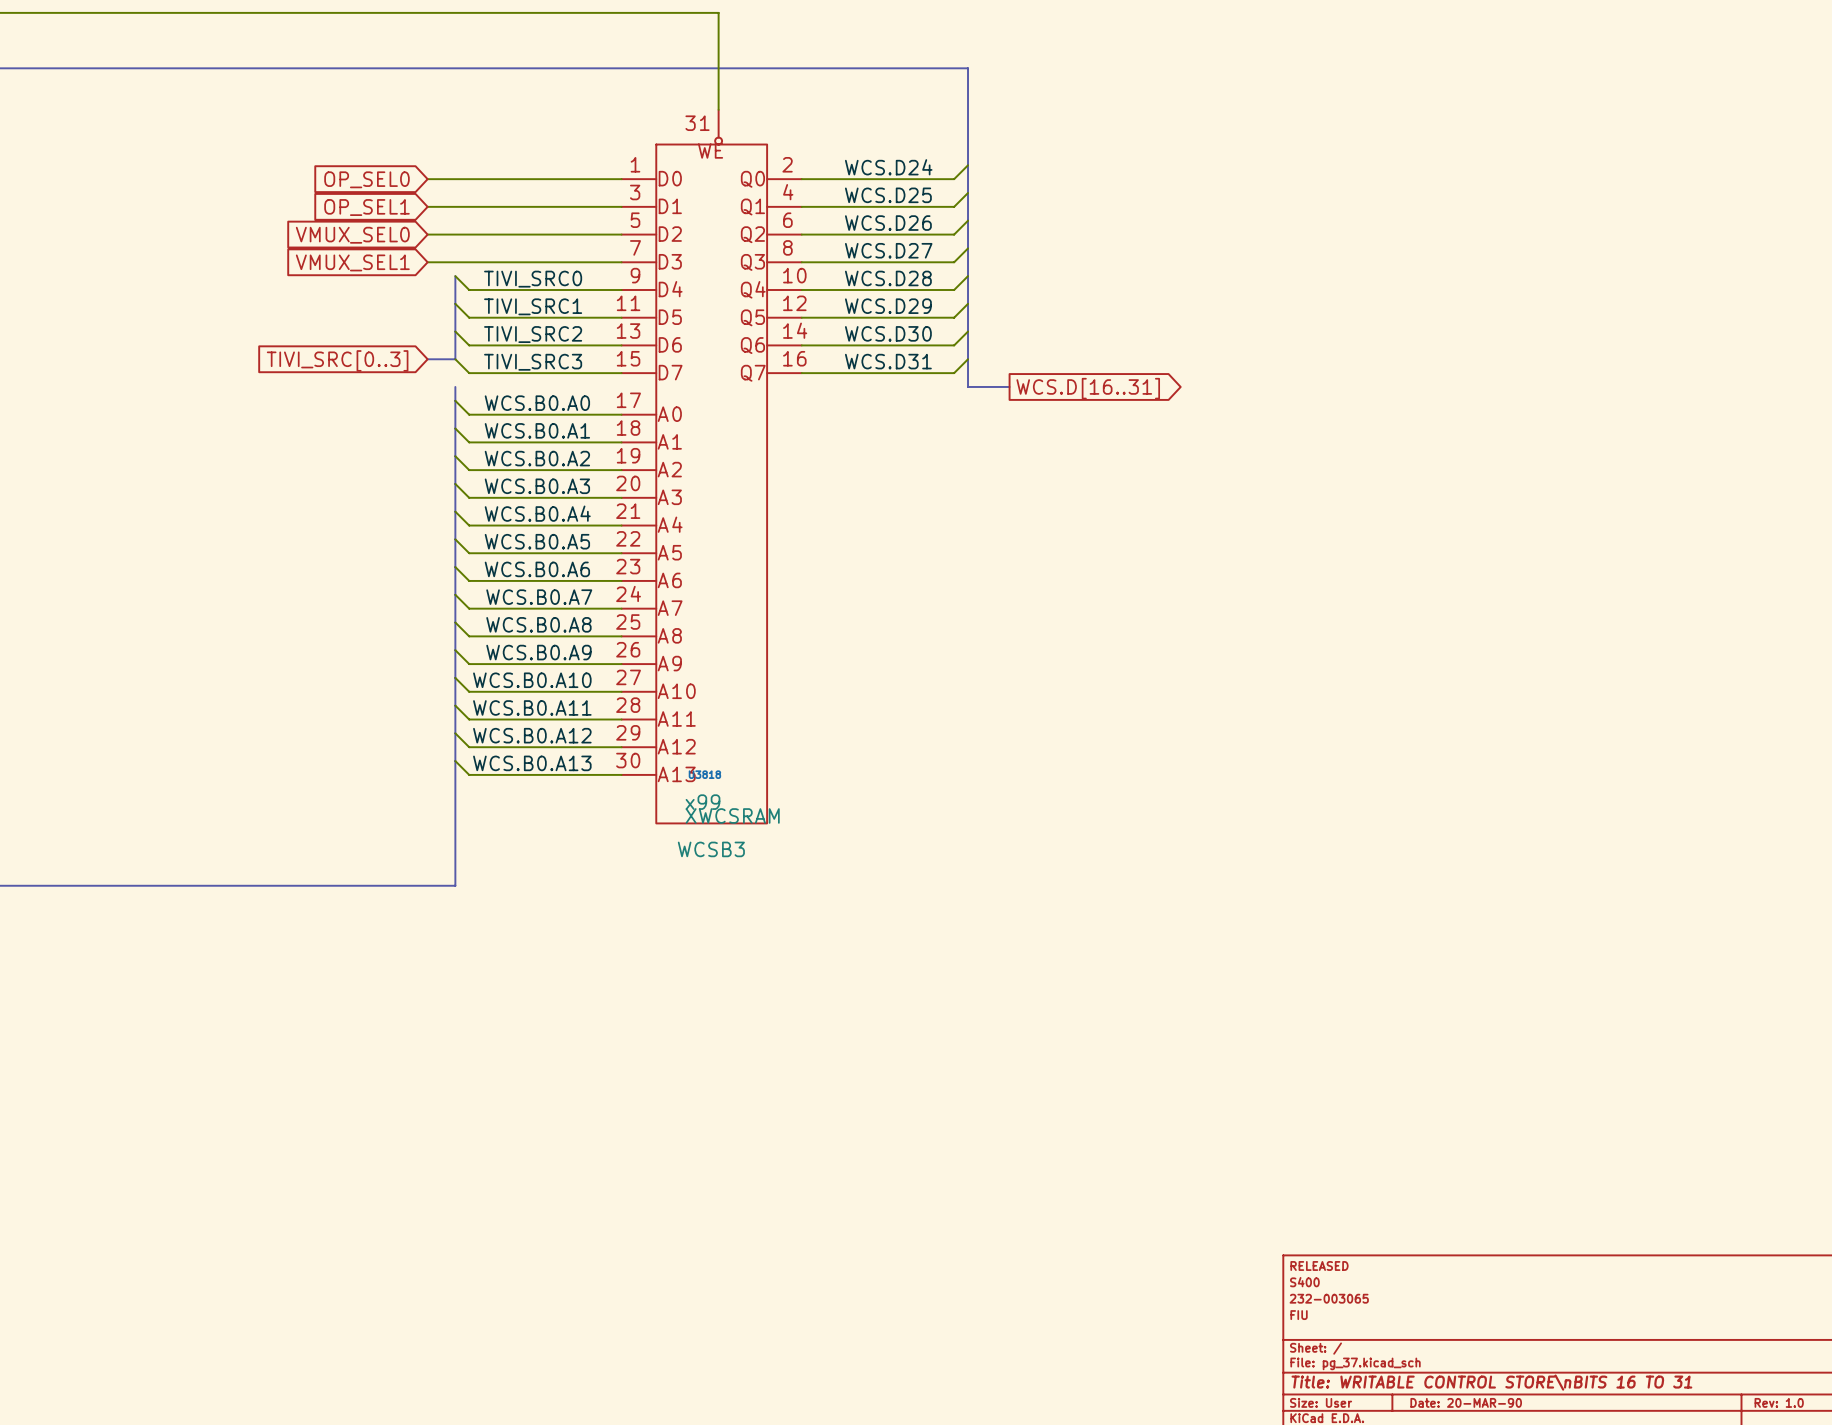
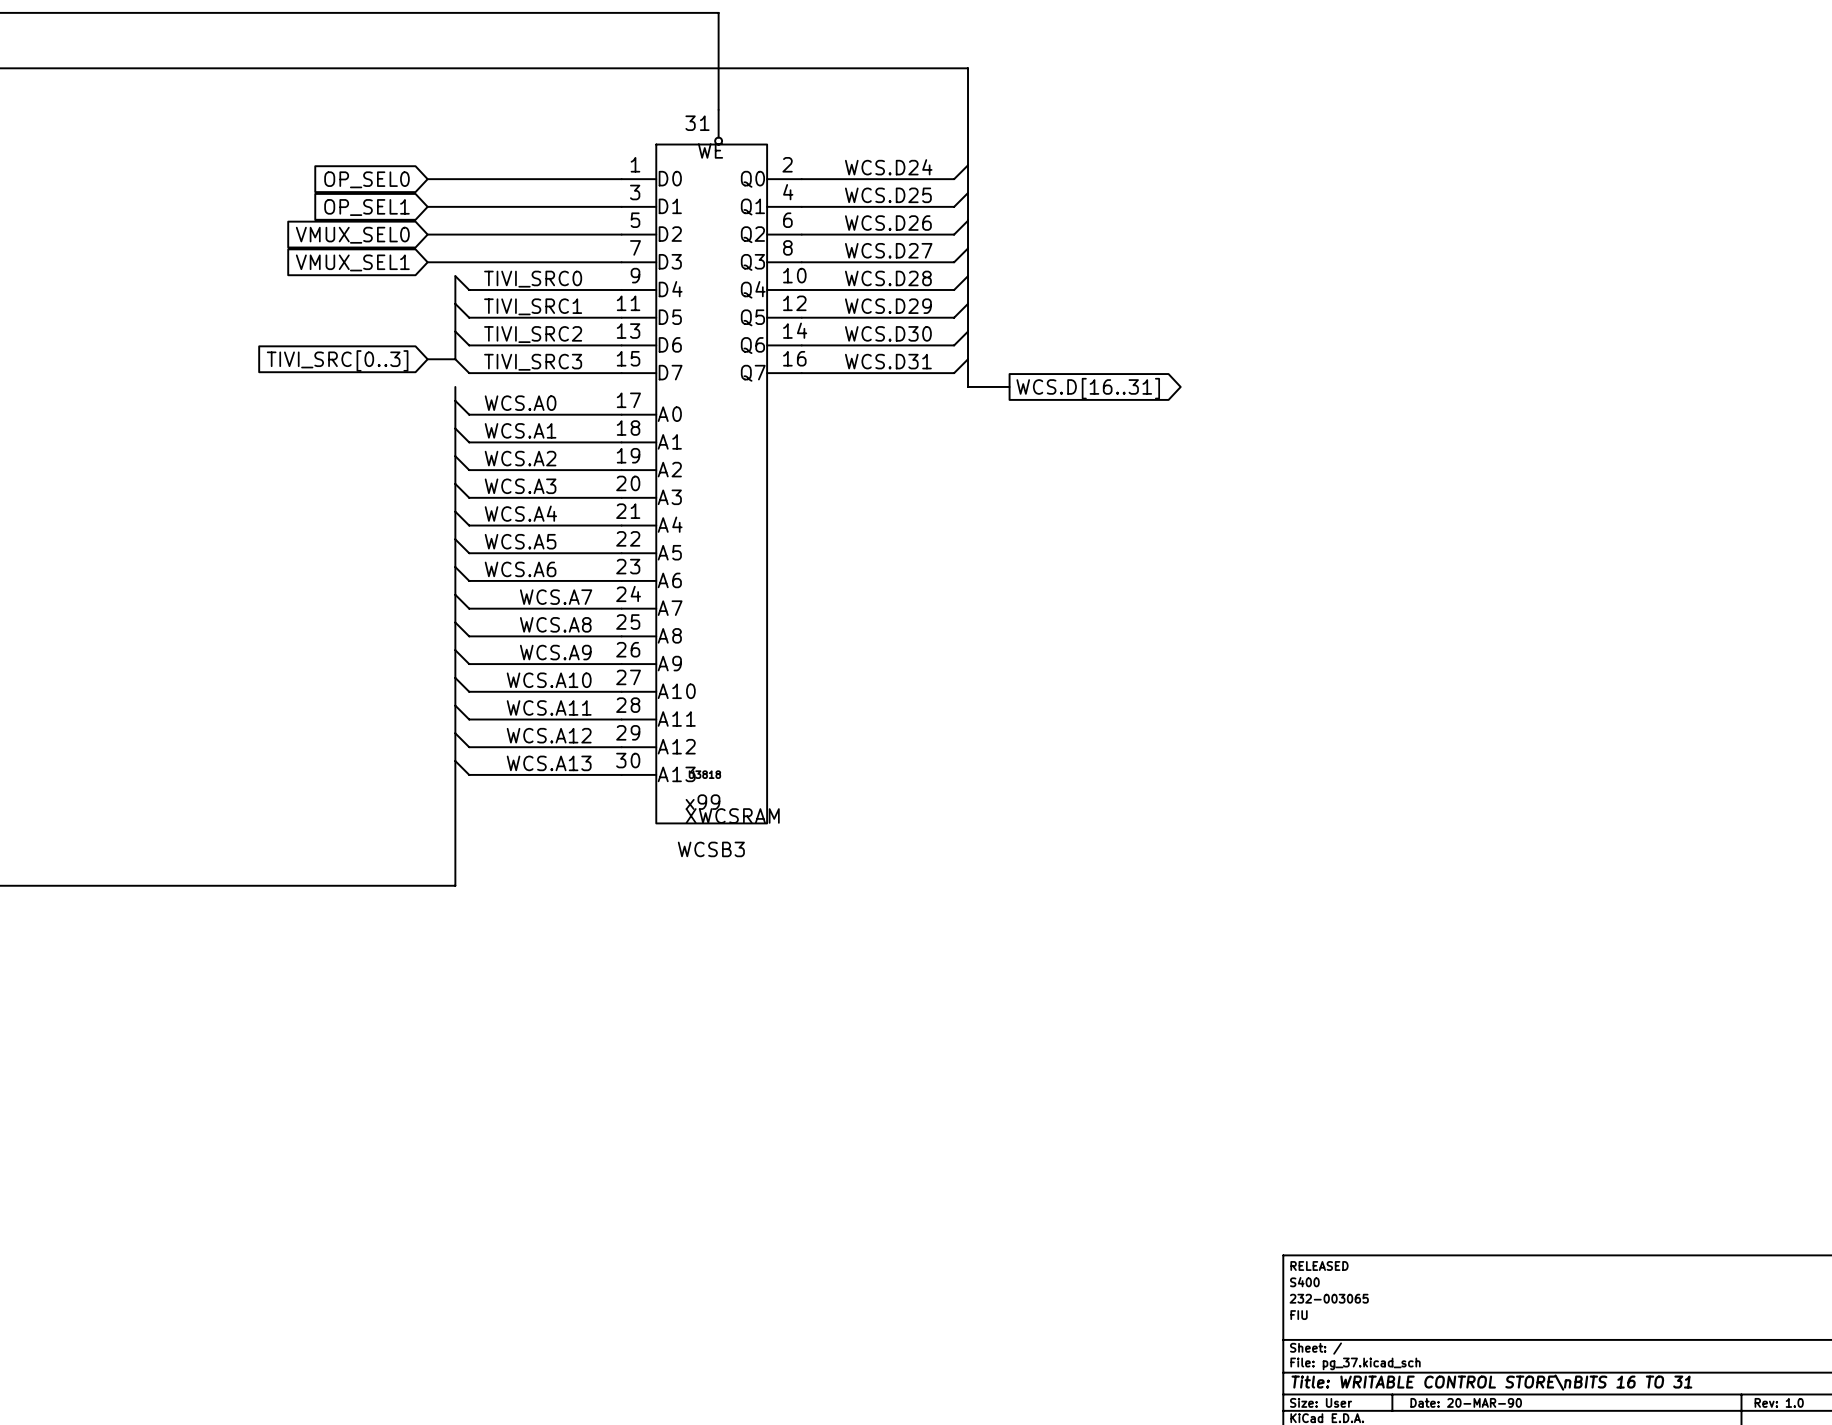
label: WCS.B0.A0 (537, 403) -> WCS.A0 (520, 403)
label: WCS.B0.A1 (537, 430) -> WCS.A1 (520, 430)
label: WCS.B0.A2 (537, 458) -> WCS.A2 (520, 458)
label: WCS.B0.A3 (537, 486) -> WCS.A3 (520, 486)
label: WCS.B0.A4 (537, 513) -> WCS.A4 (520, 513)
label: WCS.B0.A5 (537, 541) -> WCS.A5 (520, 541)
label: WCS.B0.A6 (537, 569) -> WCS.A6 (520, 569)
label: WCS.B0.A7 (539, 597) -> WCS.A7 (556, 597)
label: WCS.B0.A8 (538, 624) -> WCS.A8 (555, 624)
label: WCS.B0.A9 (538, 652) -> WCS.A9 (555, 652)
label: WCS.B0.A10 (532, 680) -> WCS.A10 (549, 680)
label: WCS.B0.A11 (532, 707) -> WCS.A11 (549, 707)
label: WCS.B0.A12 (532, 735) -> WCS.A12 (549, 735)
label: WCS.B0.A13 (532, 763) -> WCS.A13 (549, 763)

